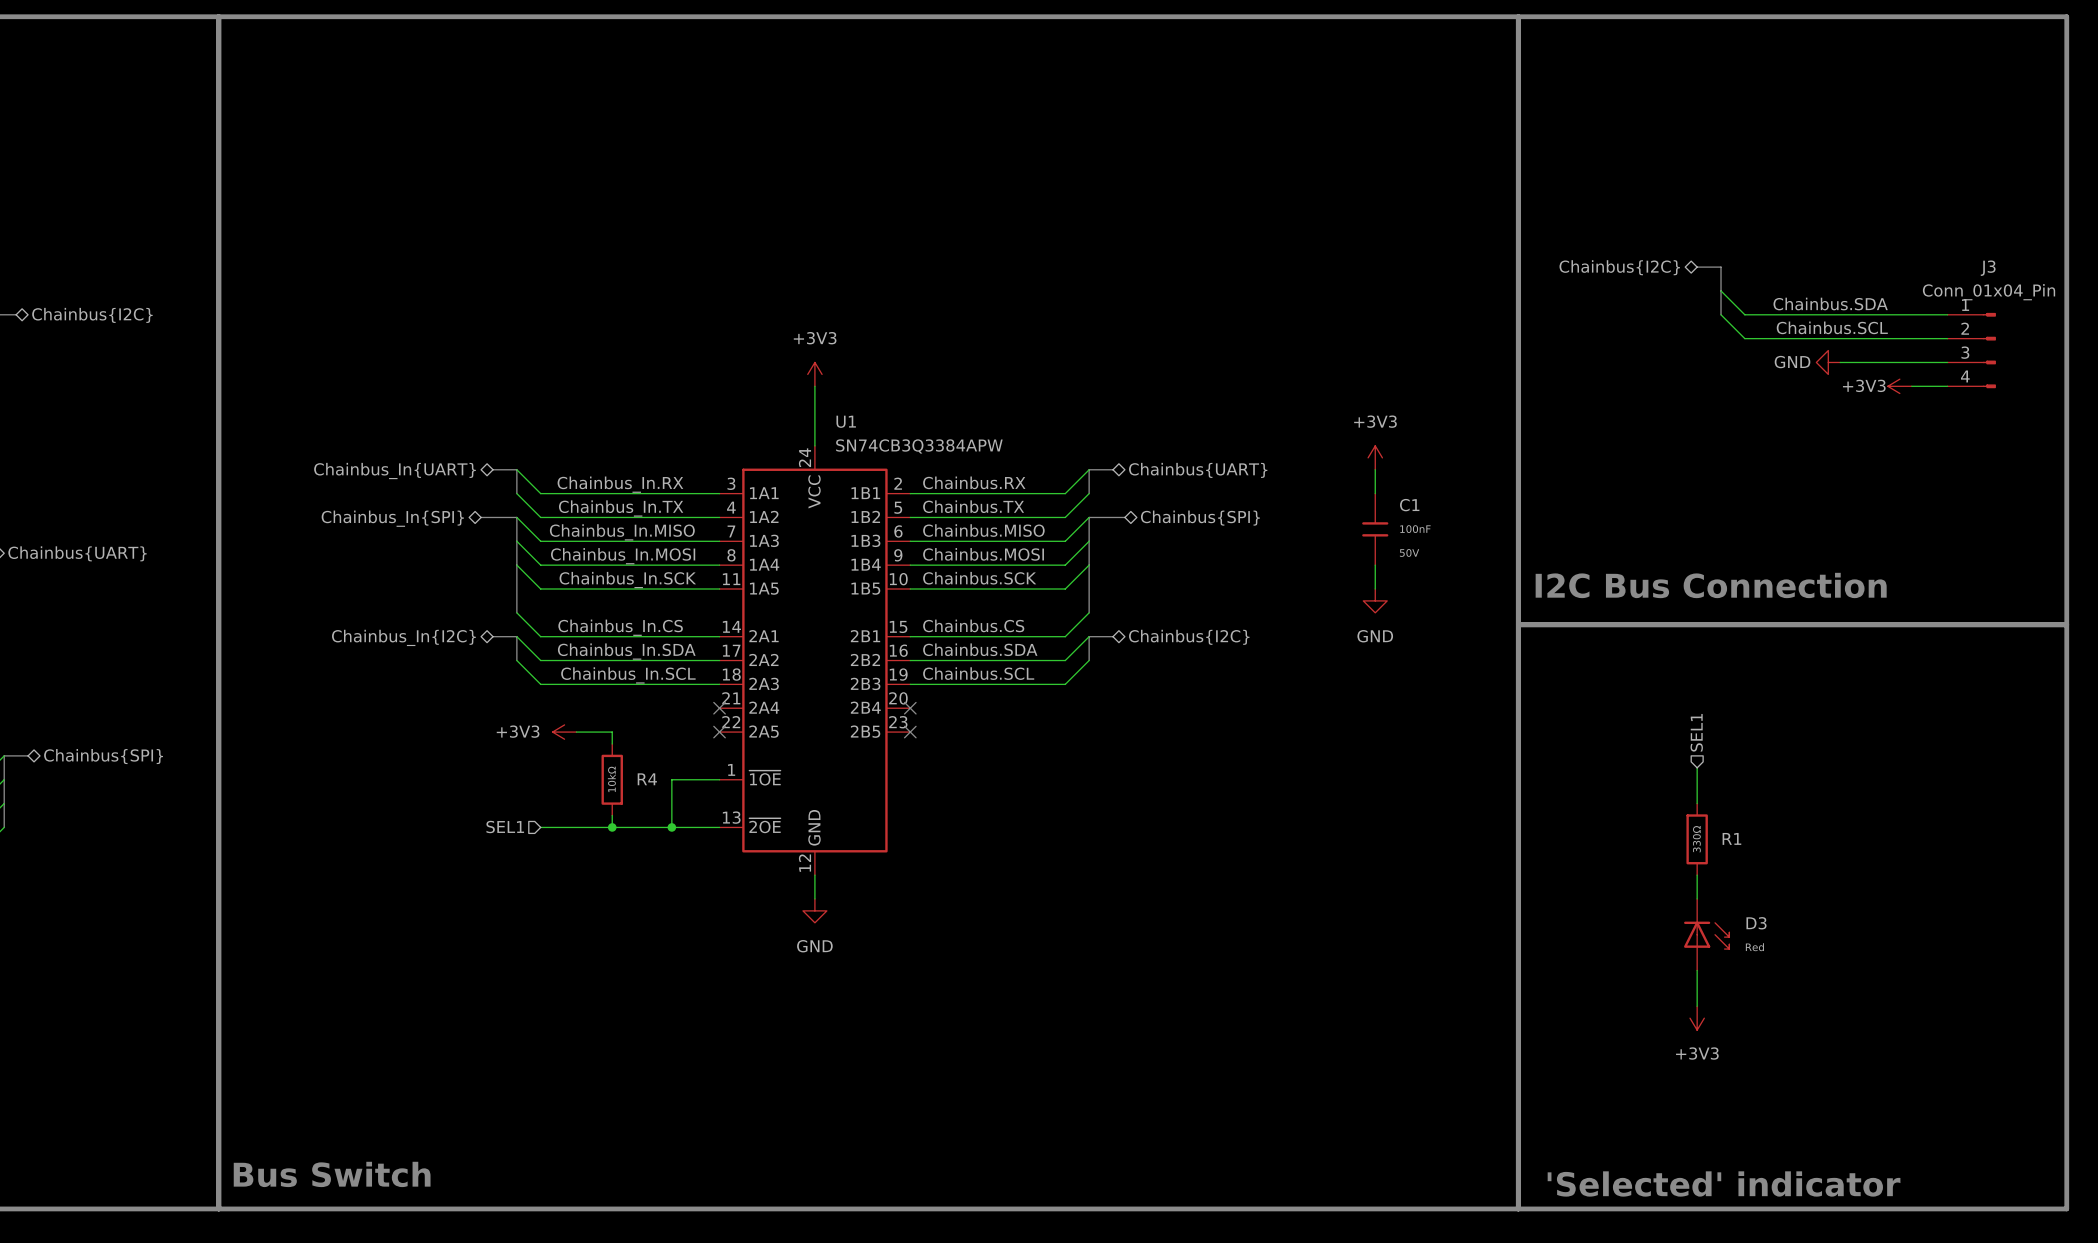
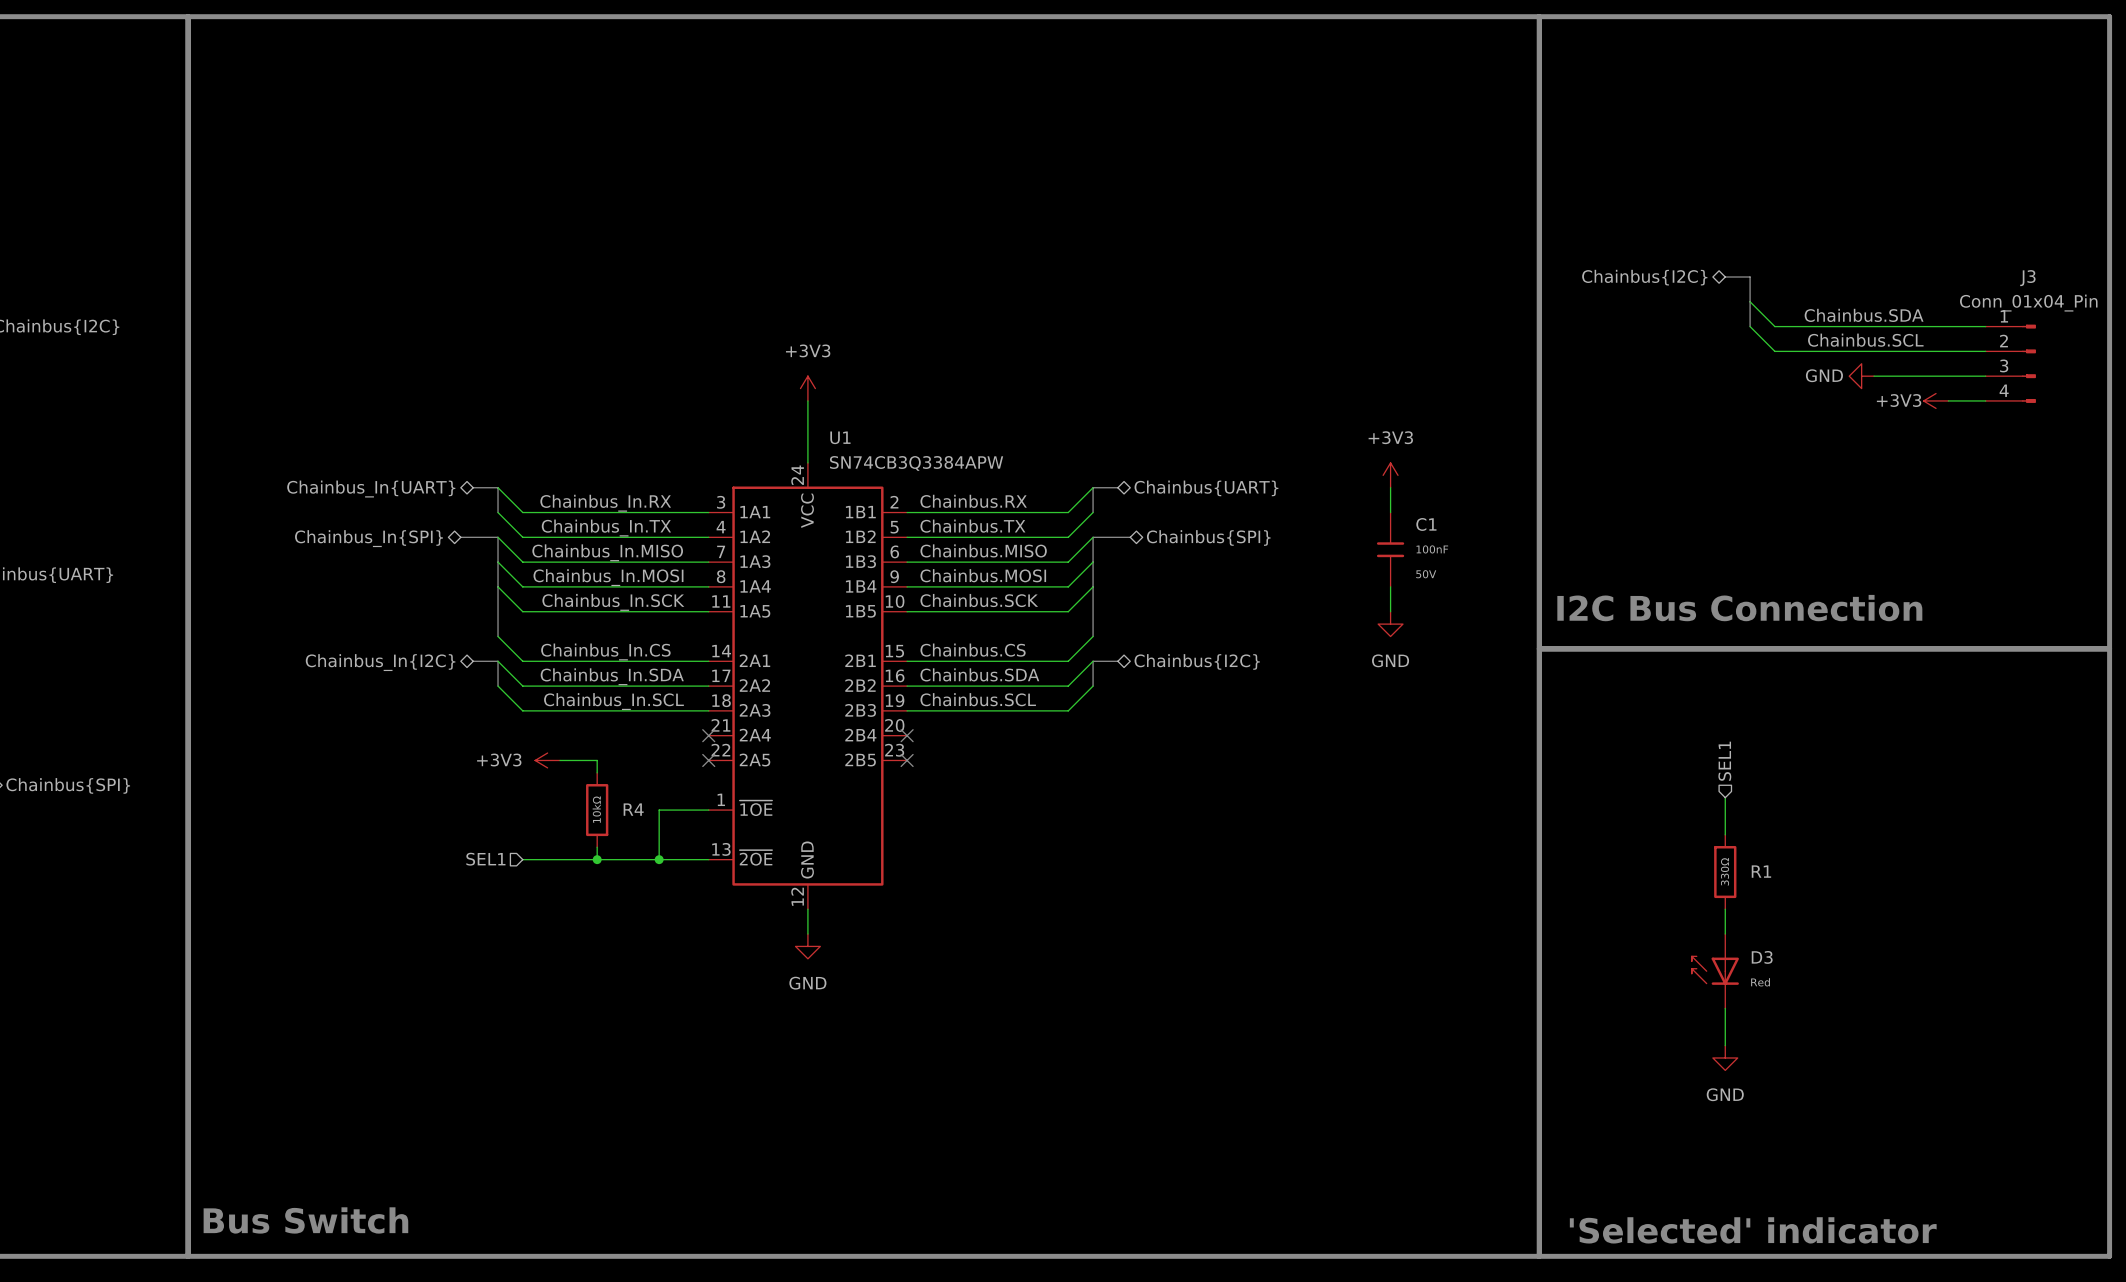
D3 rotation: 0° (1706, 935) -> 180° (1715, 970)
power symbol: +3V3 (1697, 1018) -> GND (1725, 1057)

